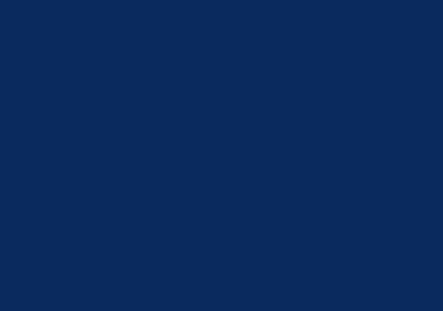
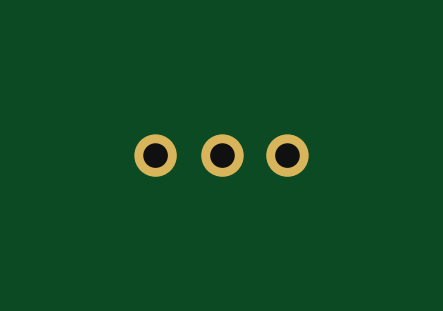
part: none -> (221, 155)

